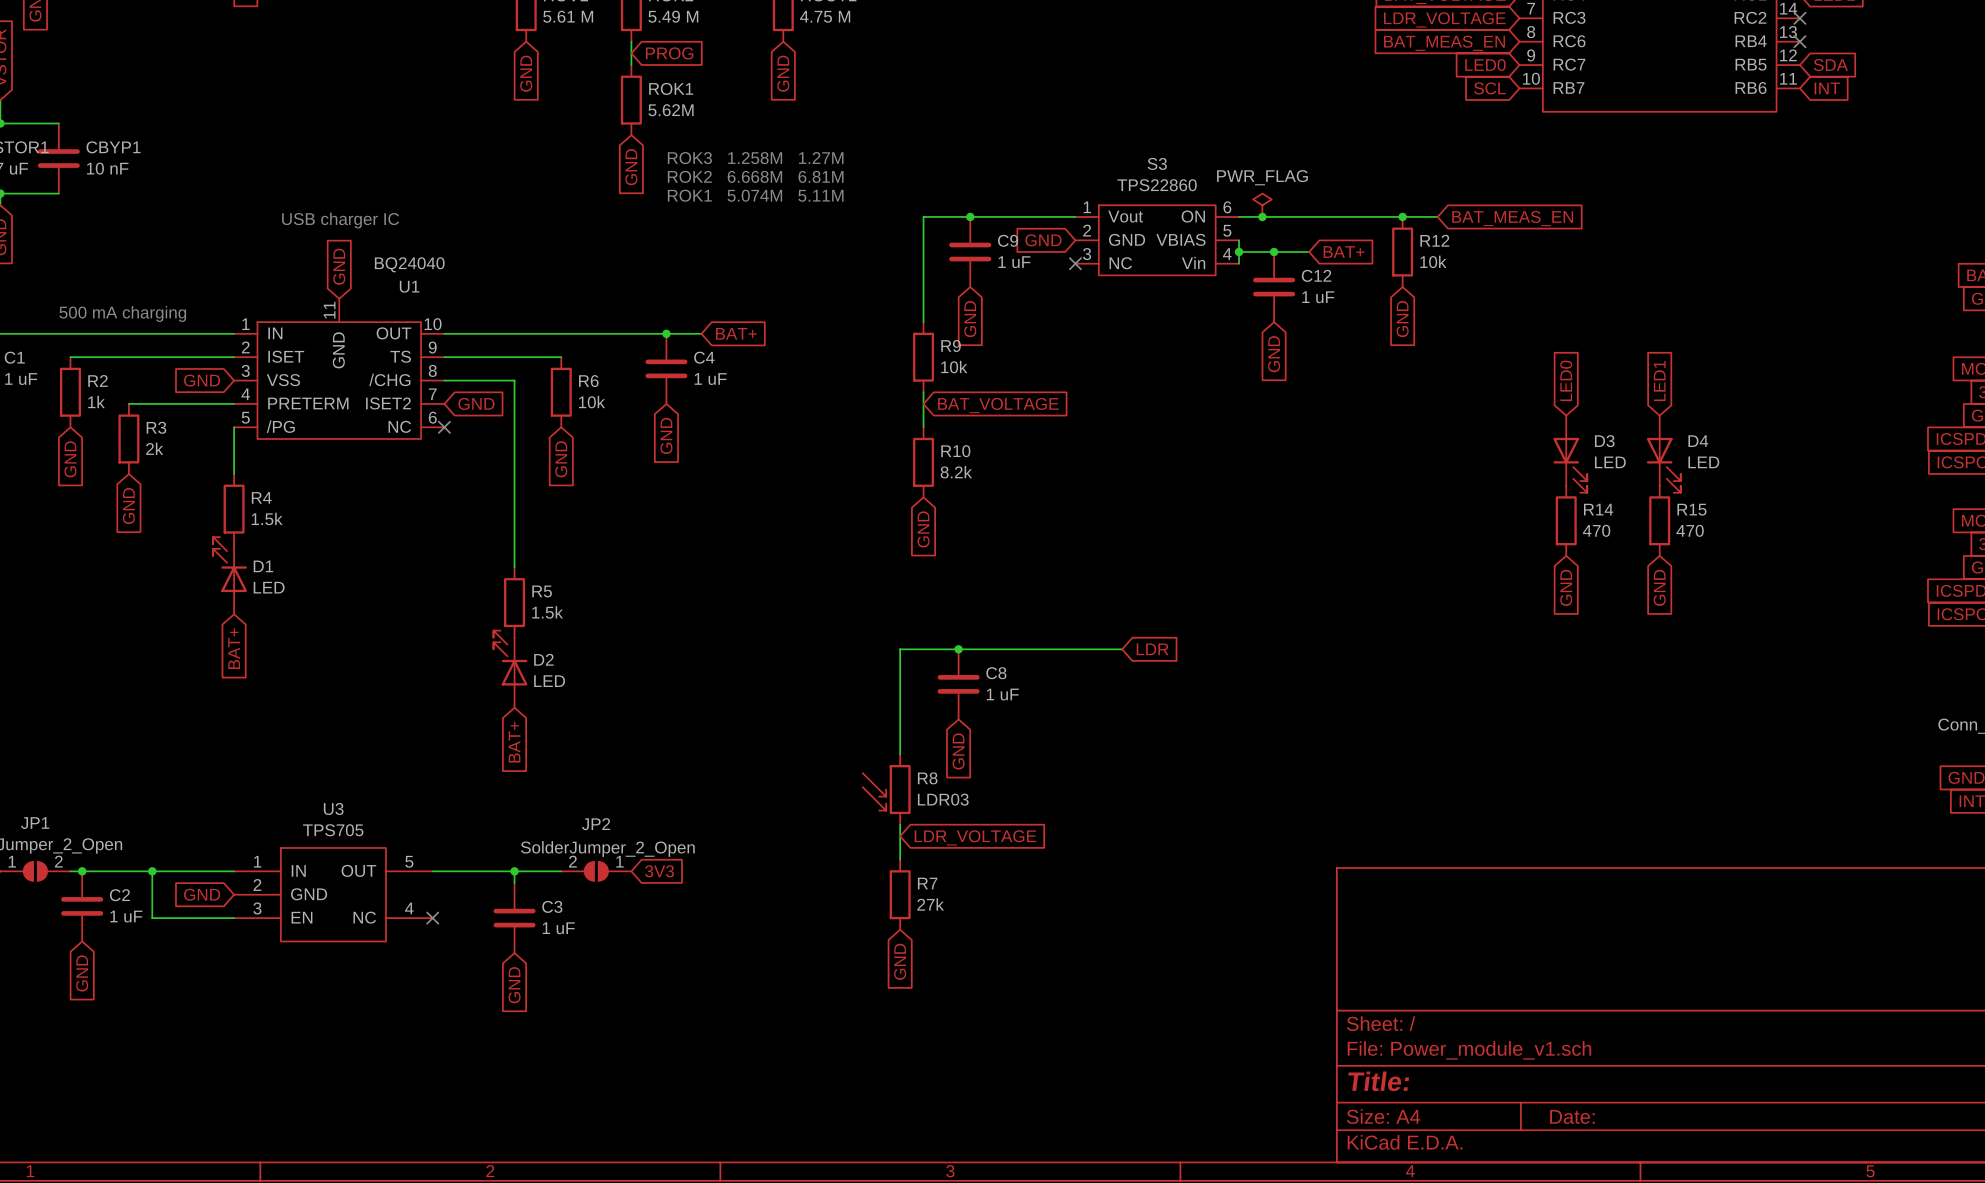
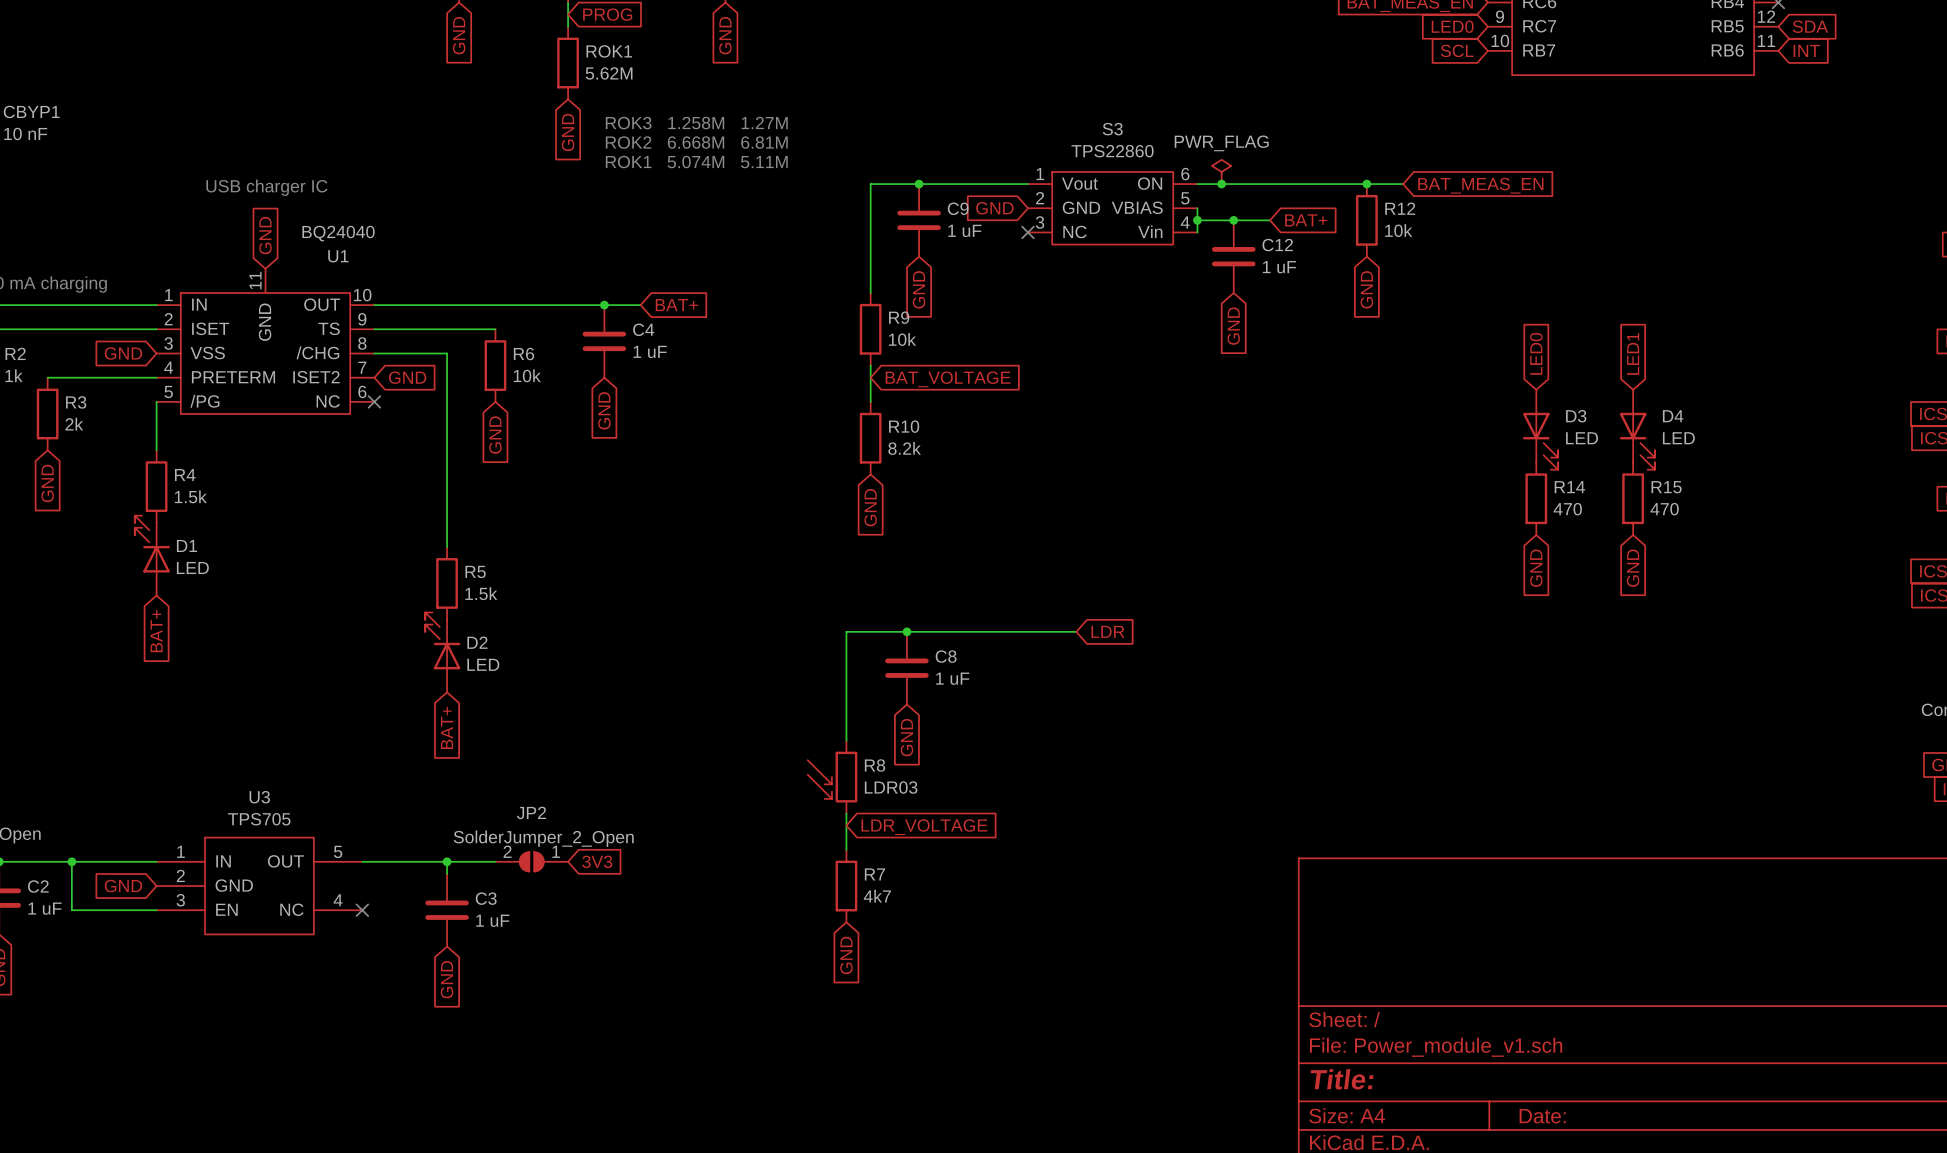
R7 value: 27k (930, 904) -> 4k7 (877, 896)

